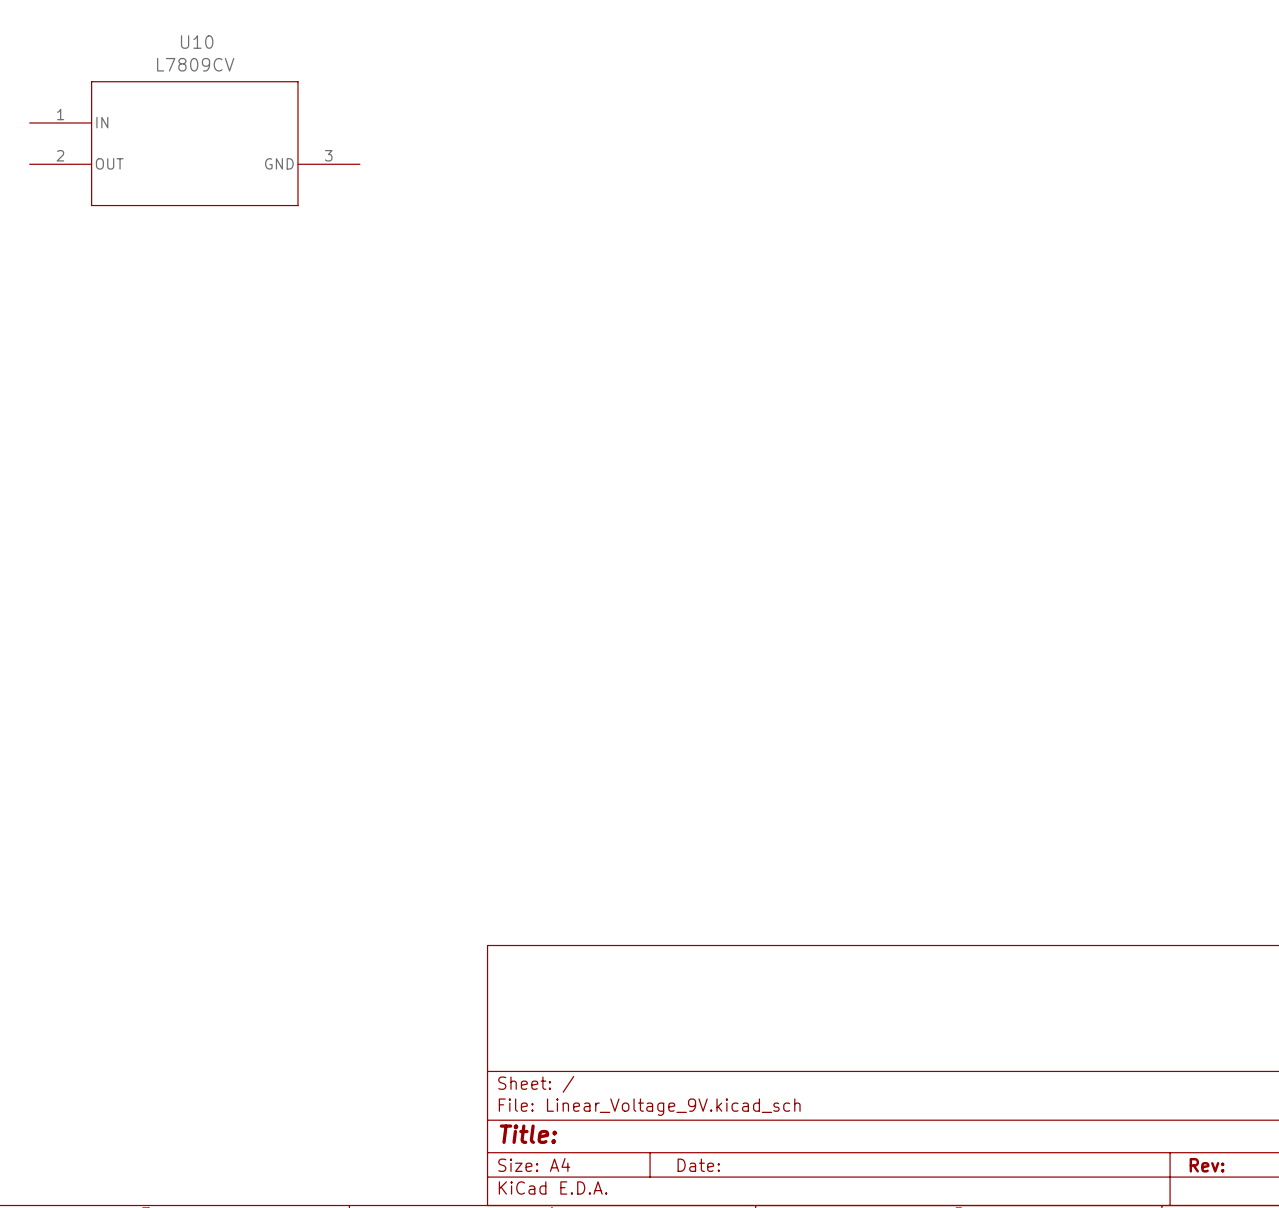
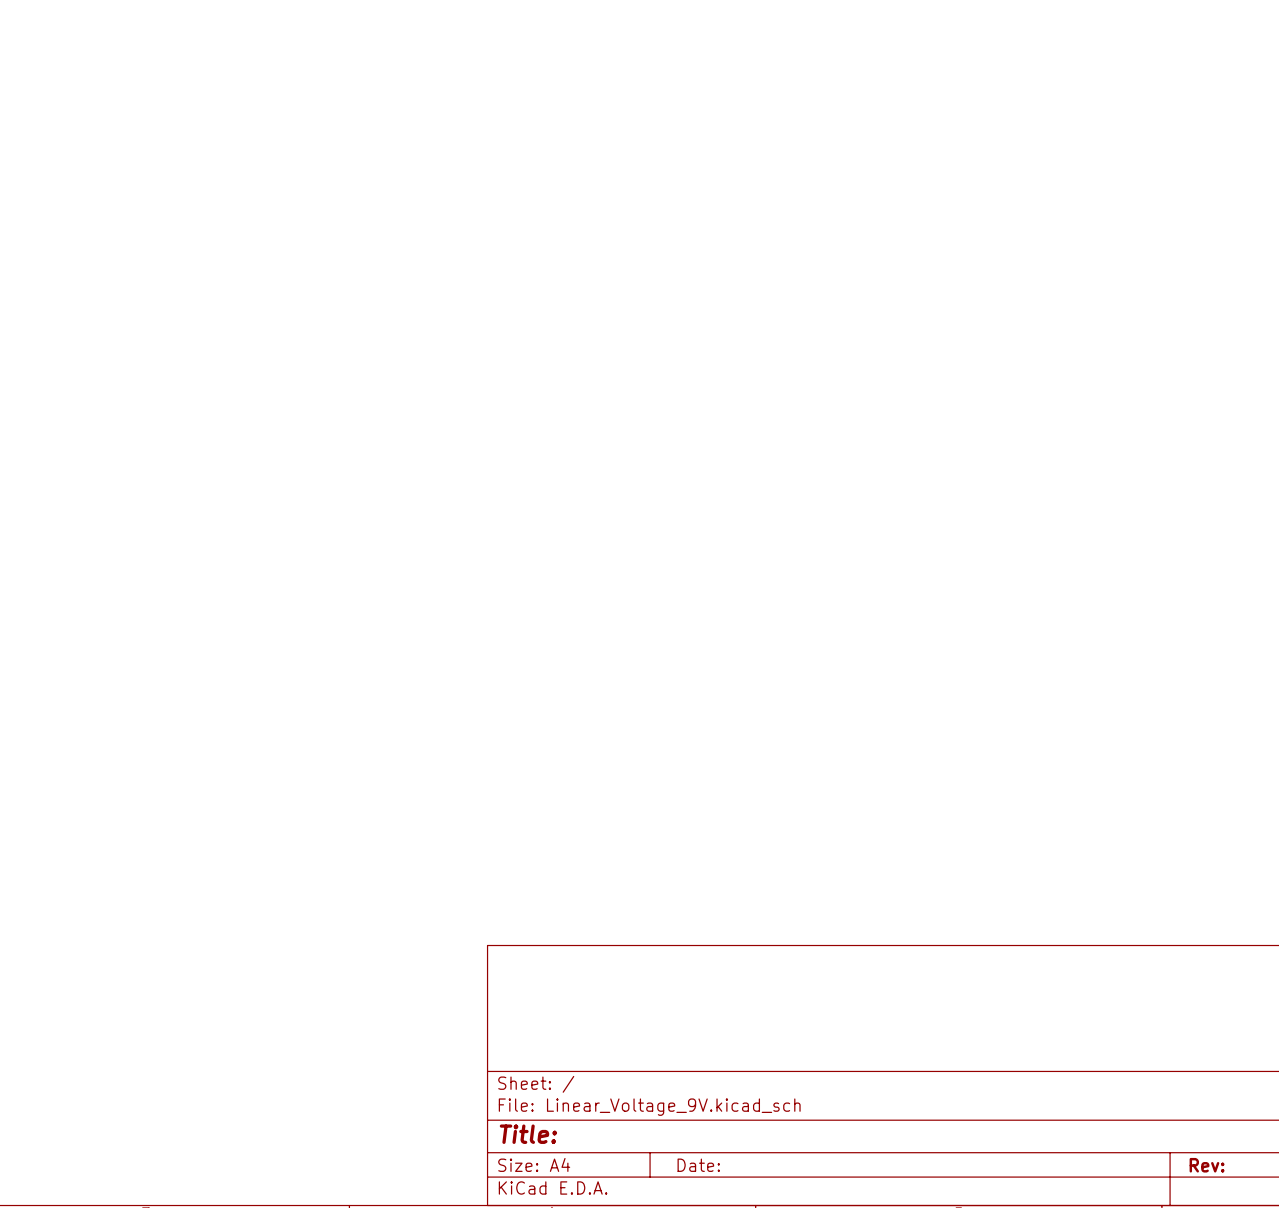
U10: L7809CV (194, 143) -> none

